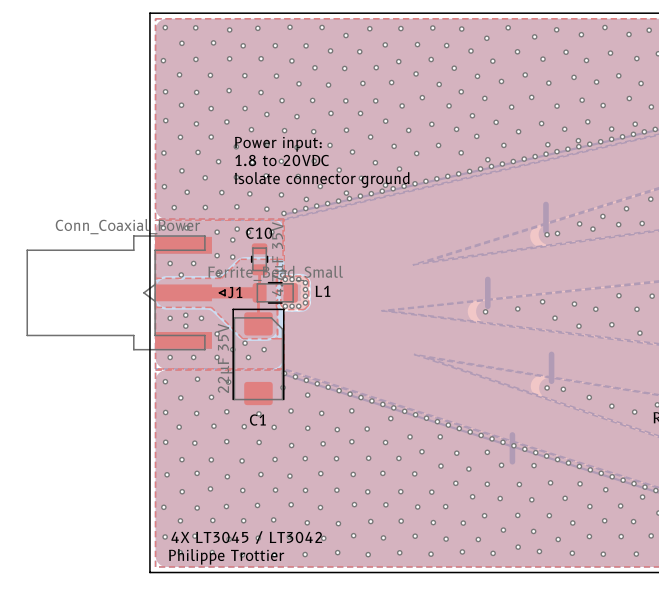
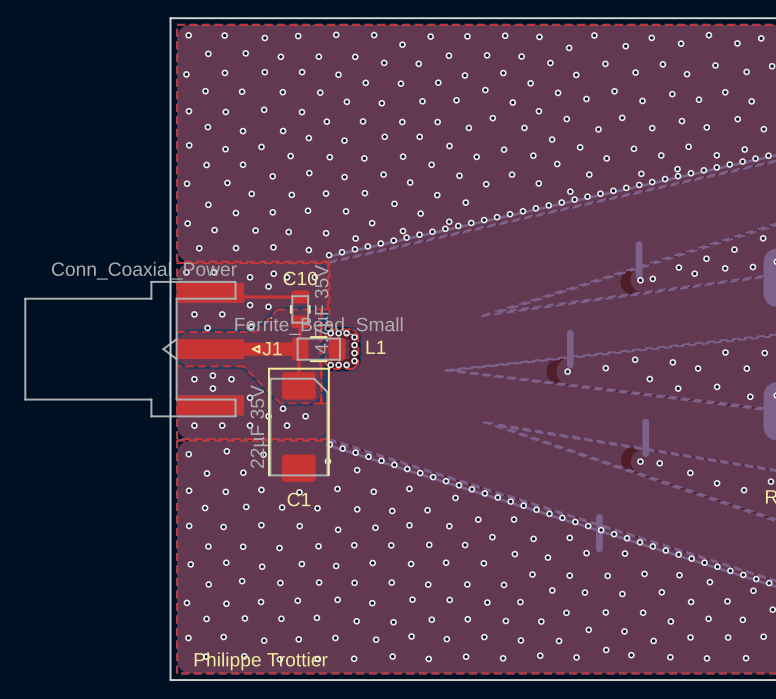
text: Power input: (278, 144) -> none
text: 1.8 to 20VDC (282, 160) -> none
text: Isolate connector ground (322, 179) -> none
top track: none -> (214, 297) (300, 297)
text: 4X LT3045 / LT3042 (246, 537) -> none

